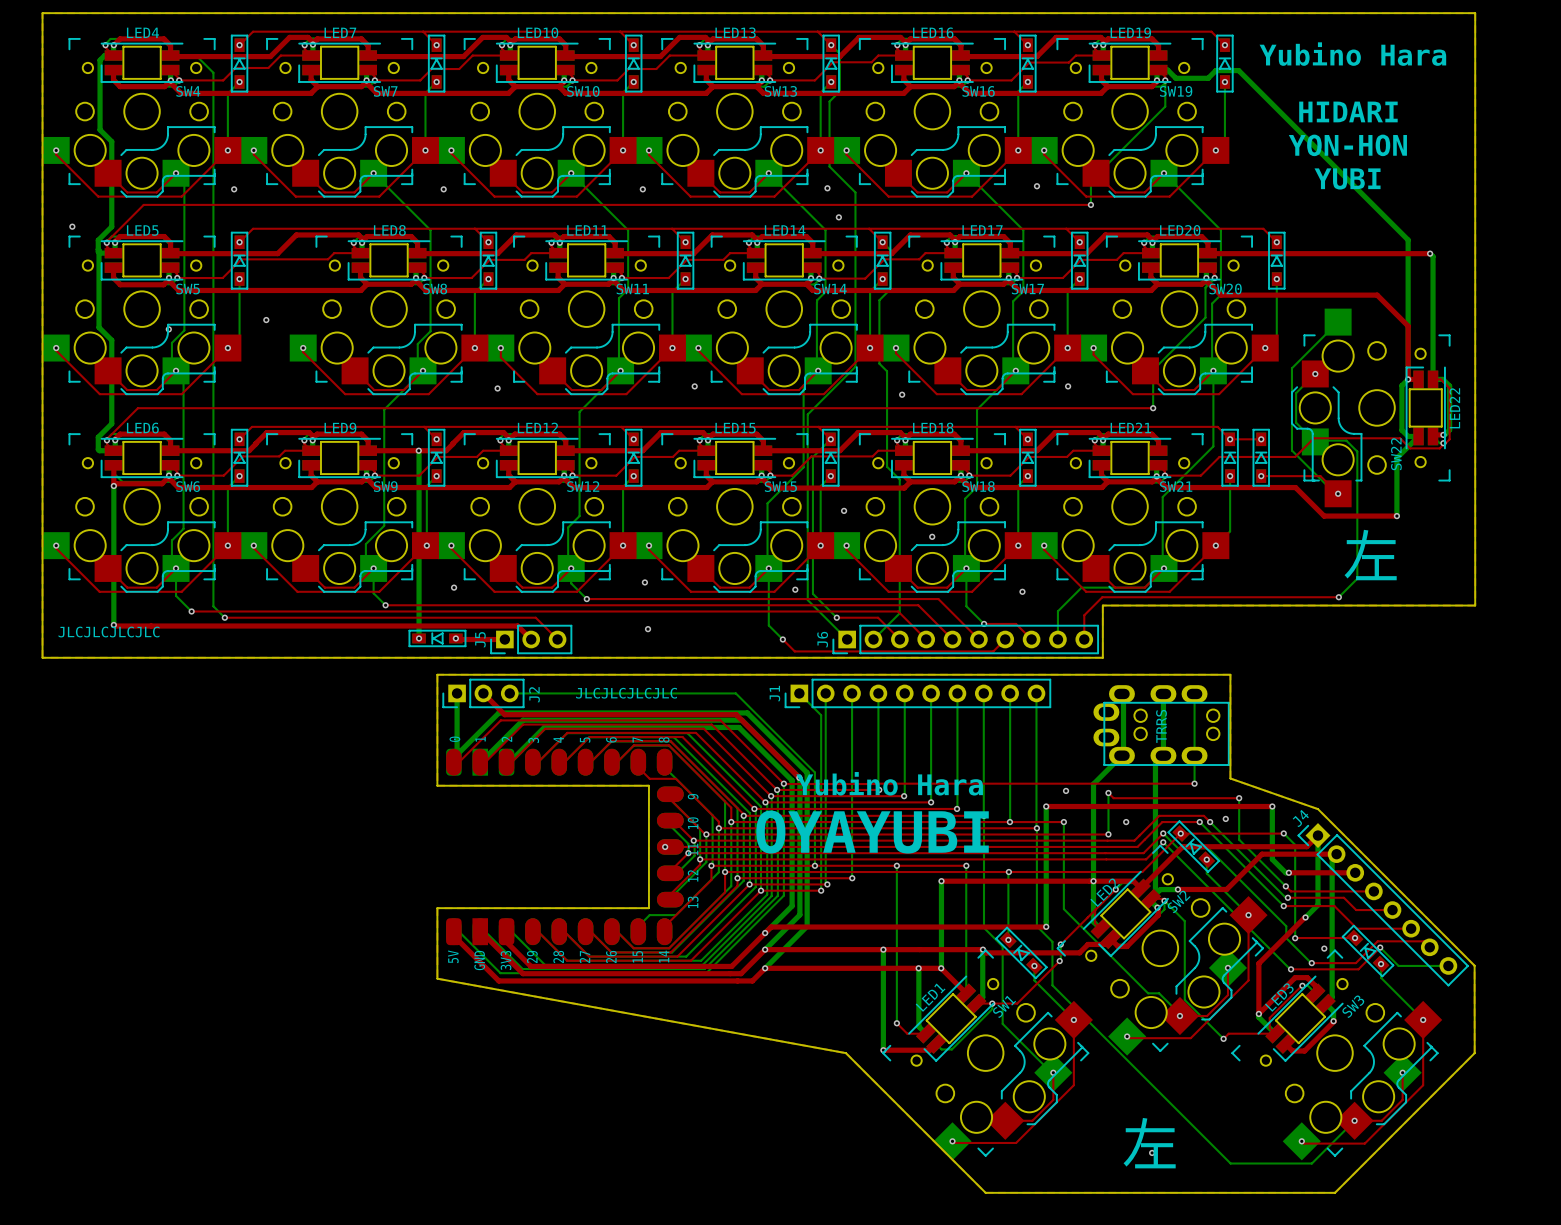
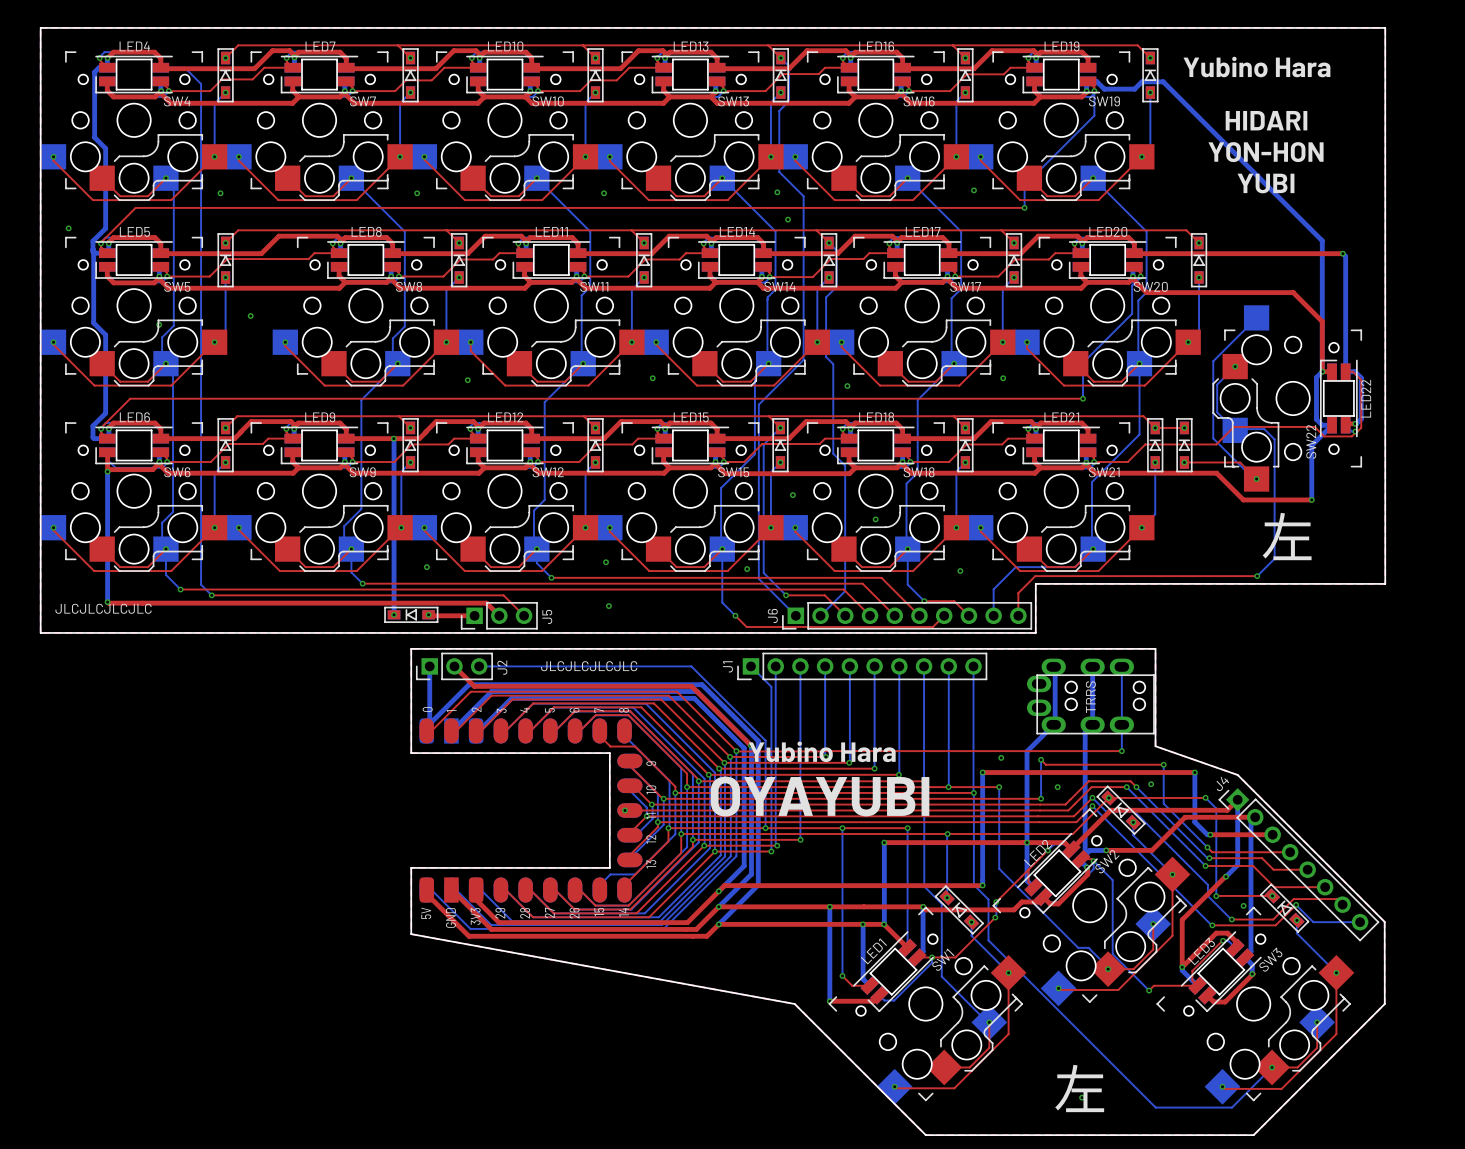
J5 name position: J5 (480, 639) -> J5 (547, 616)

